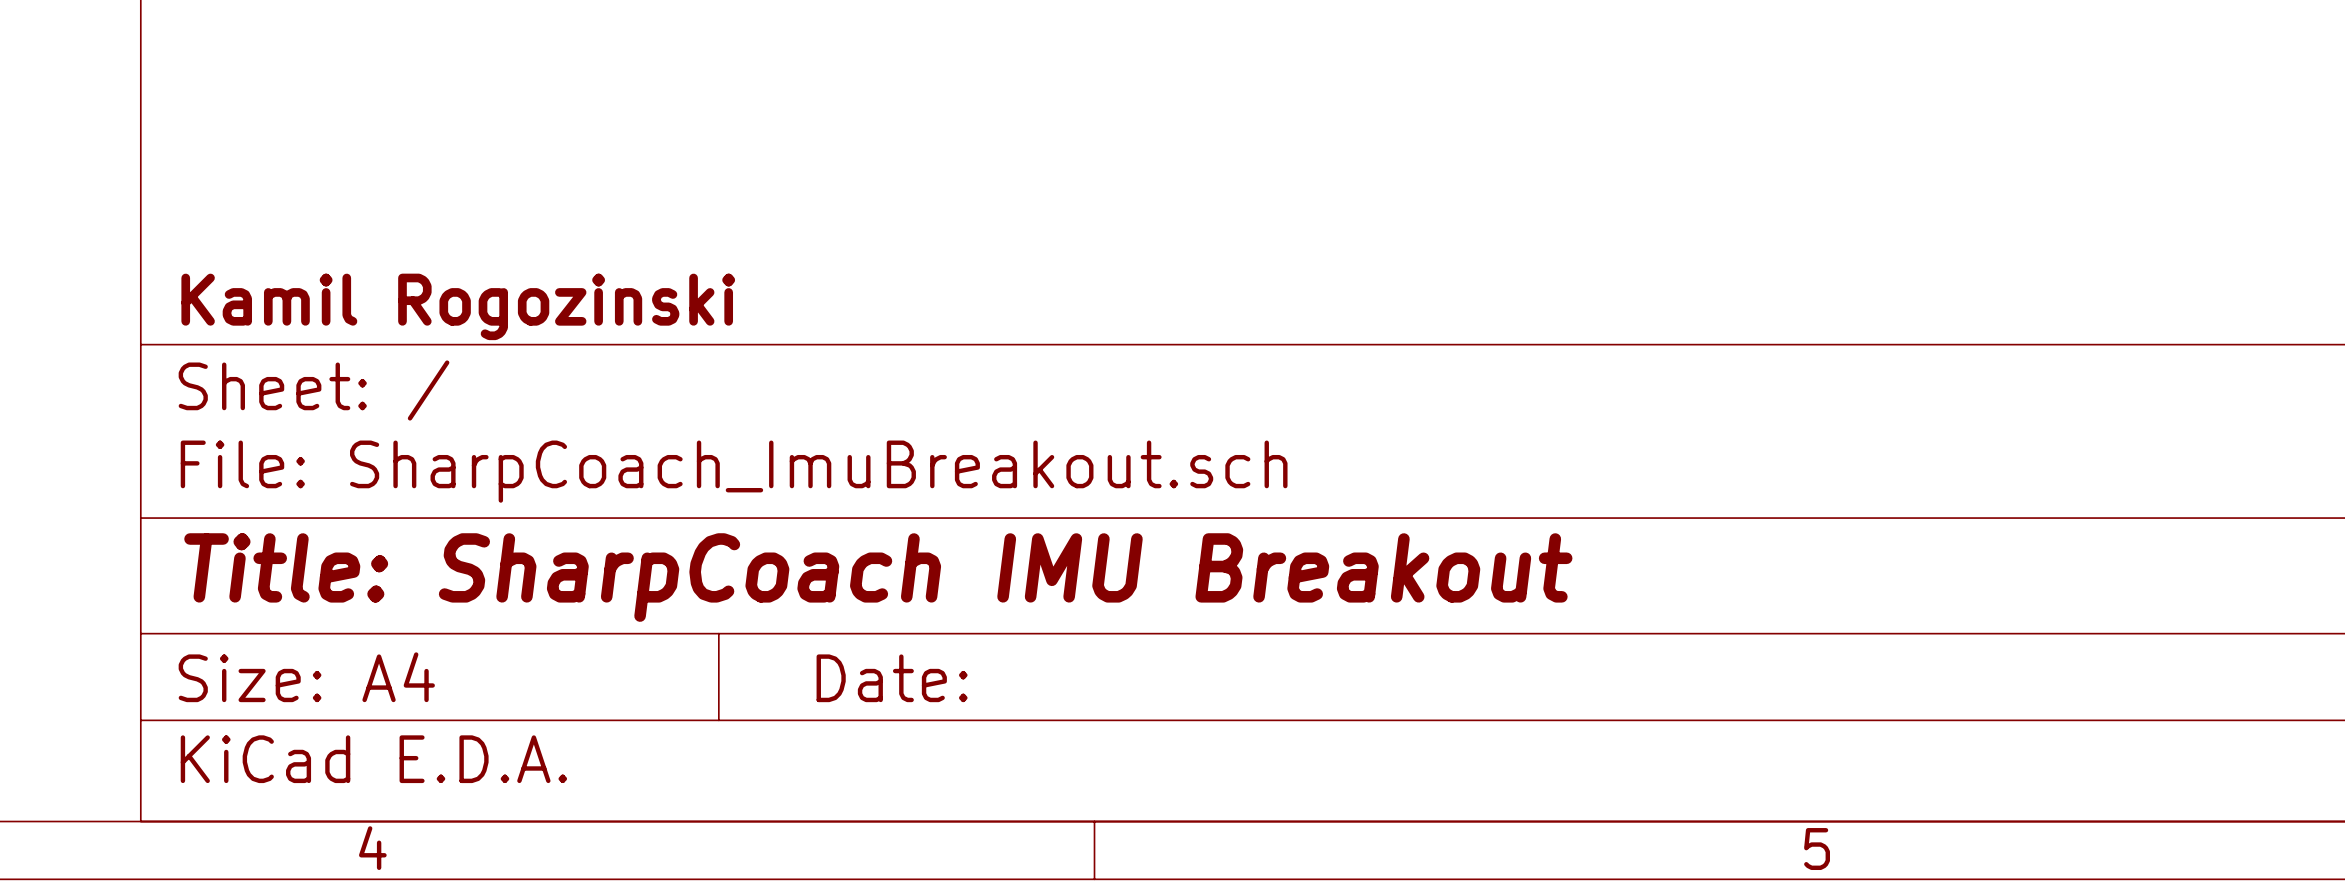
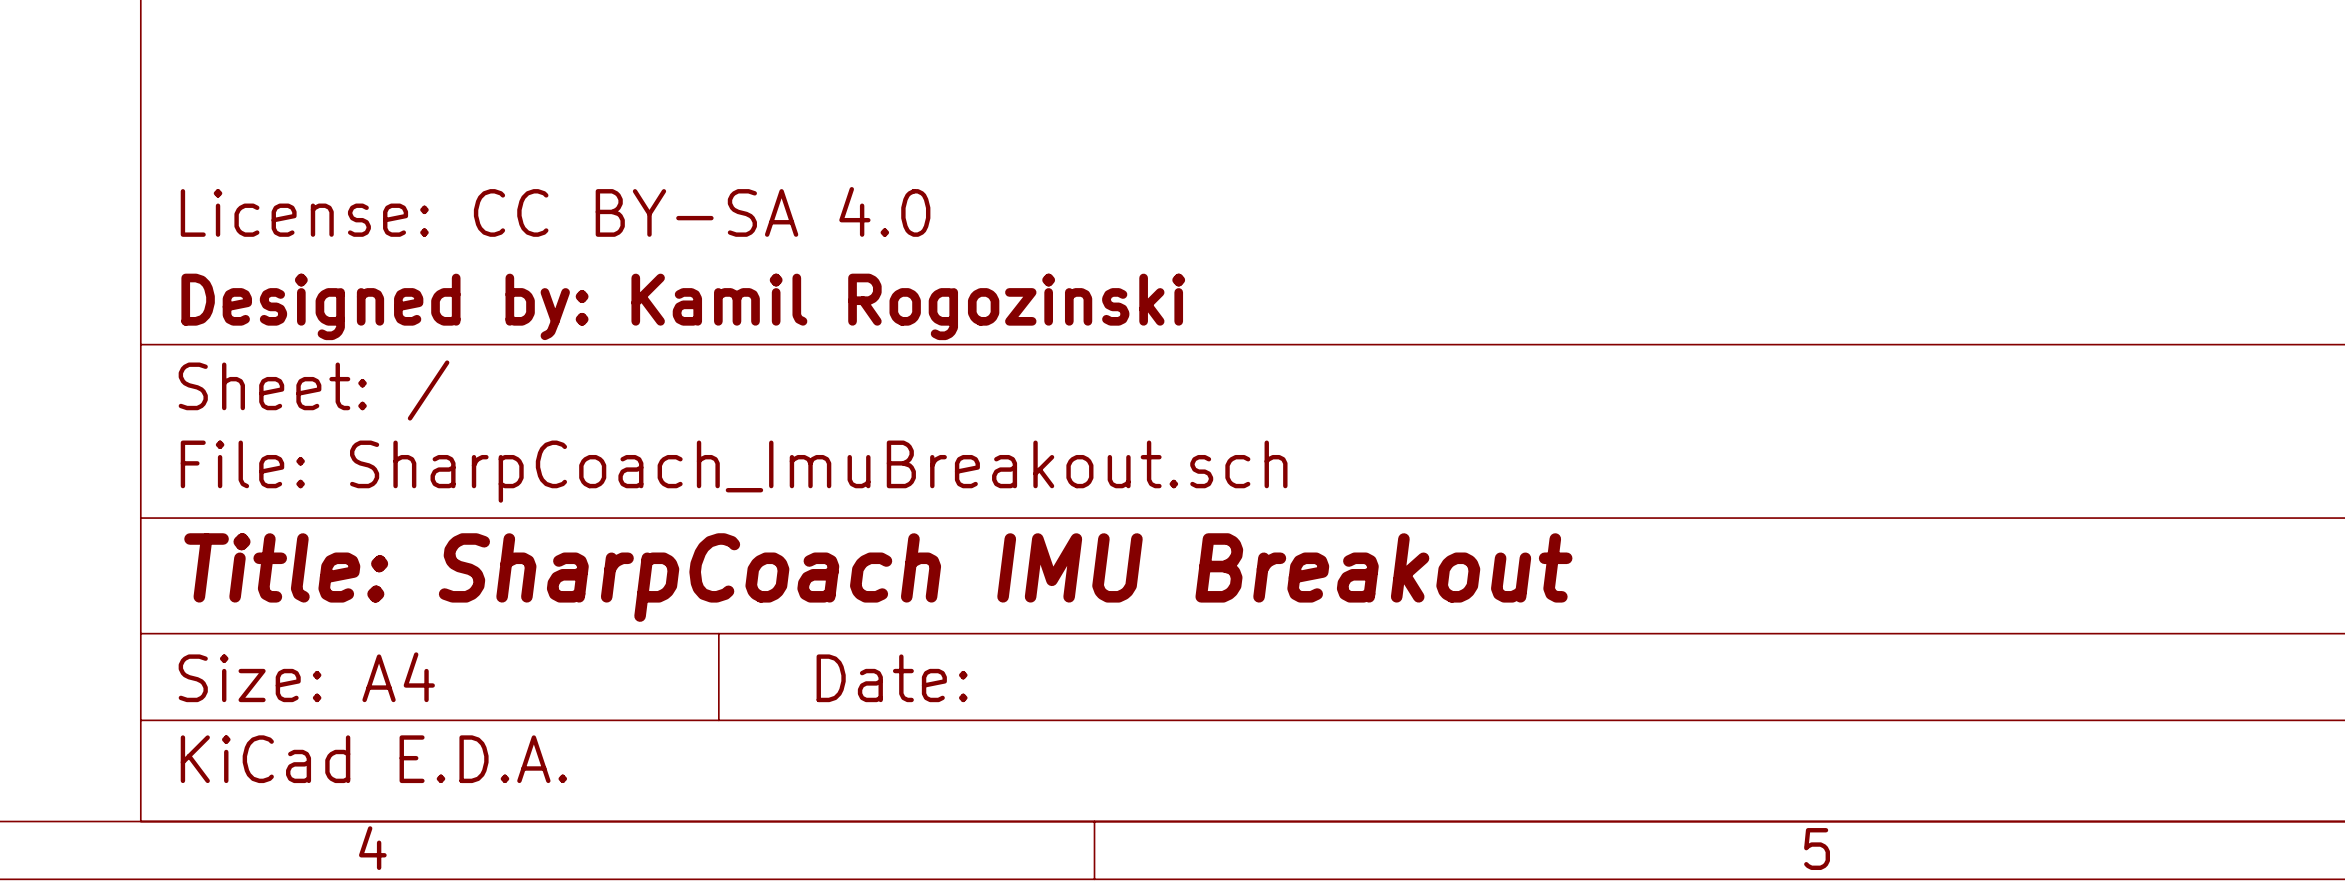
title block: none -> License: CC BY-SA 4.0 (555, 211)
title block: Kamil Rogozinski (458, 306) -> Designed by: Kamil Rogozinski (683, 306)

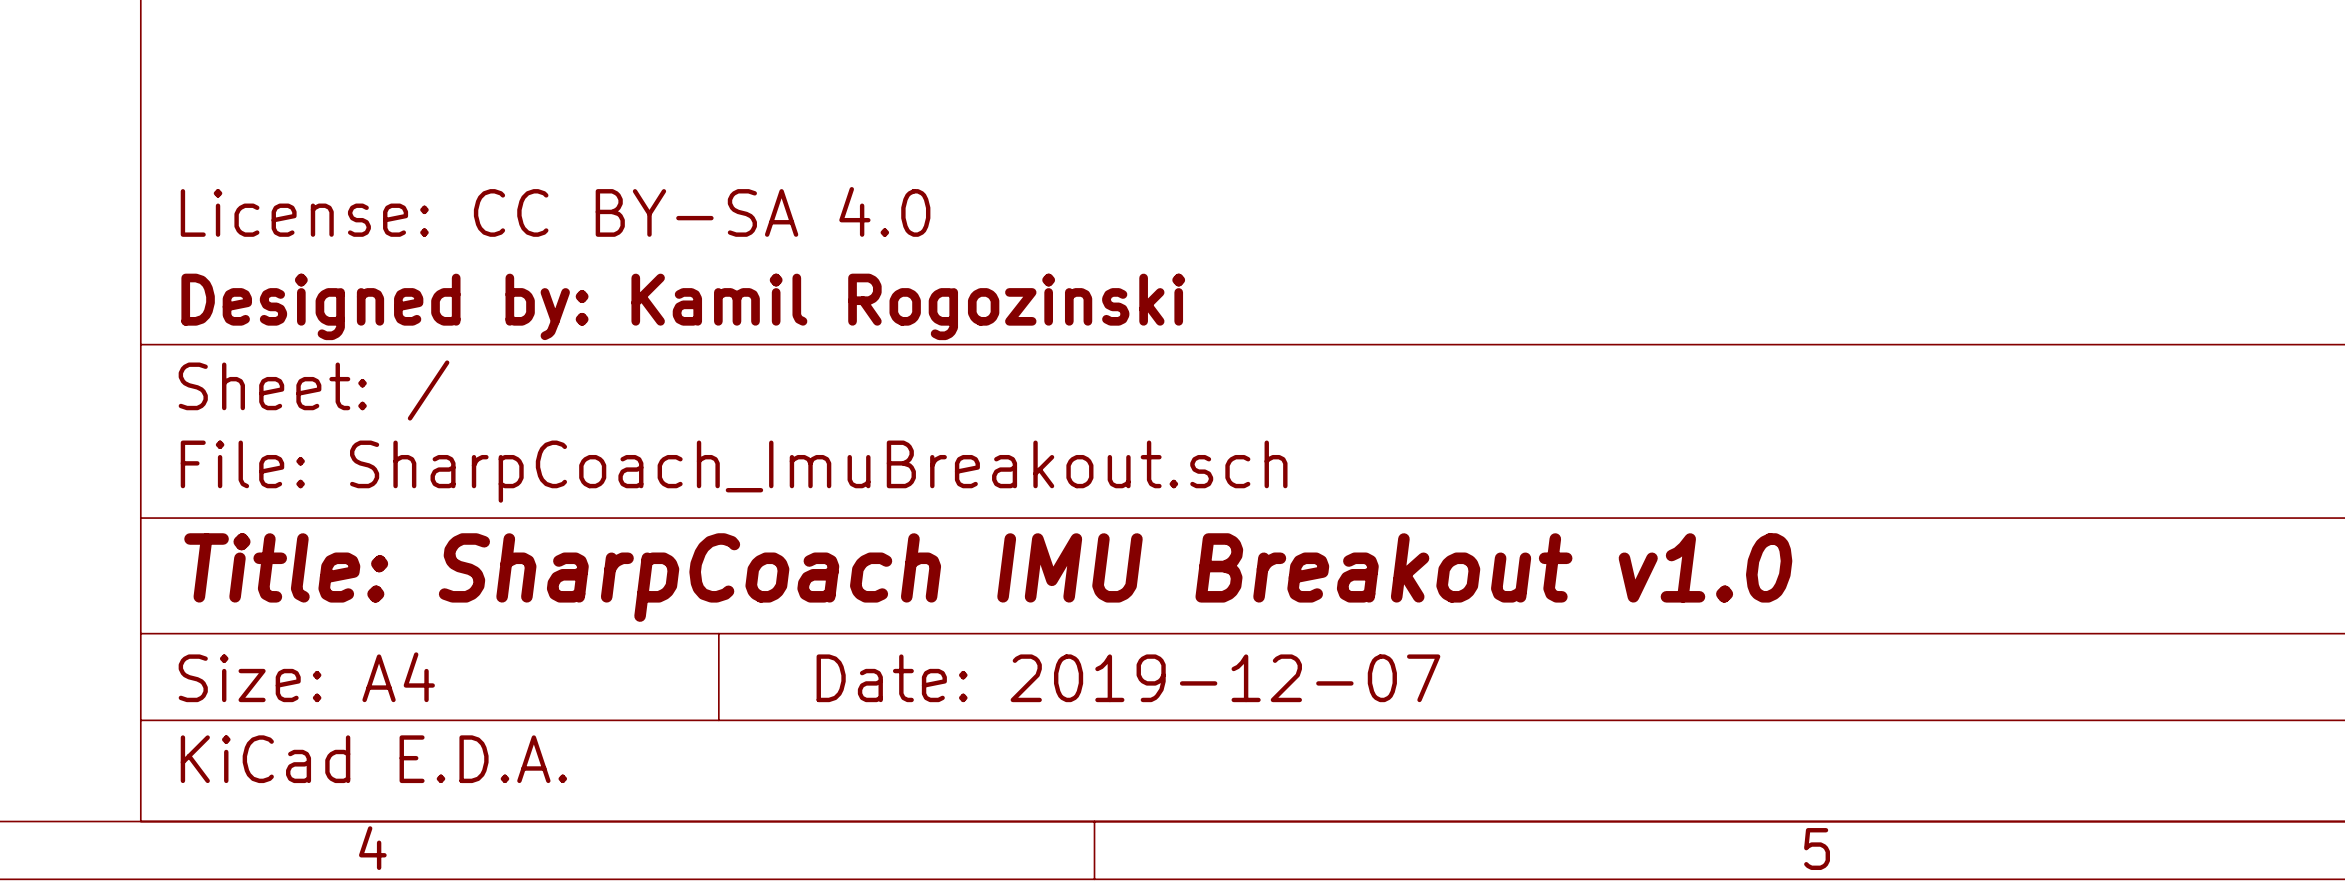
title block: Title: SharpCoach IMU Breakout (878, 577) -> Title: SharpCoach IMU Breakout v1.0 (988, 577)
title block: Date: (892, 678) -> Date: 2019-12-07 (1128, 678)

